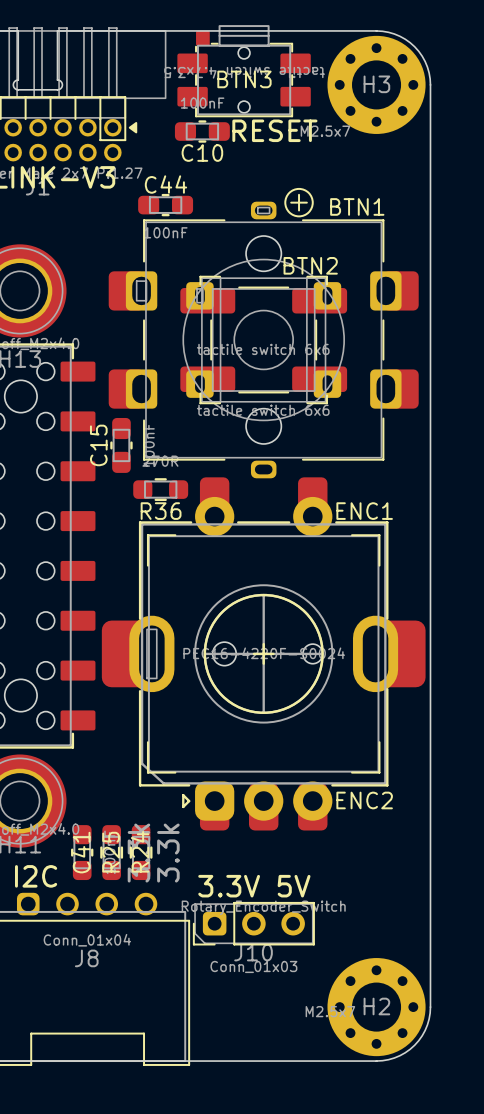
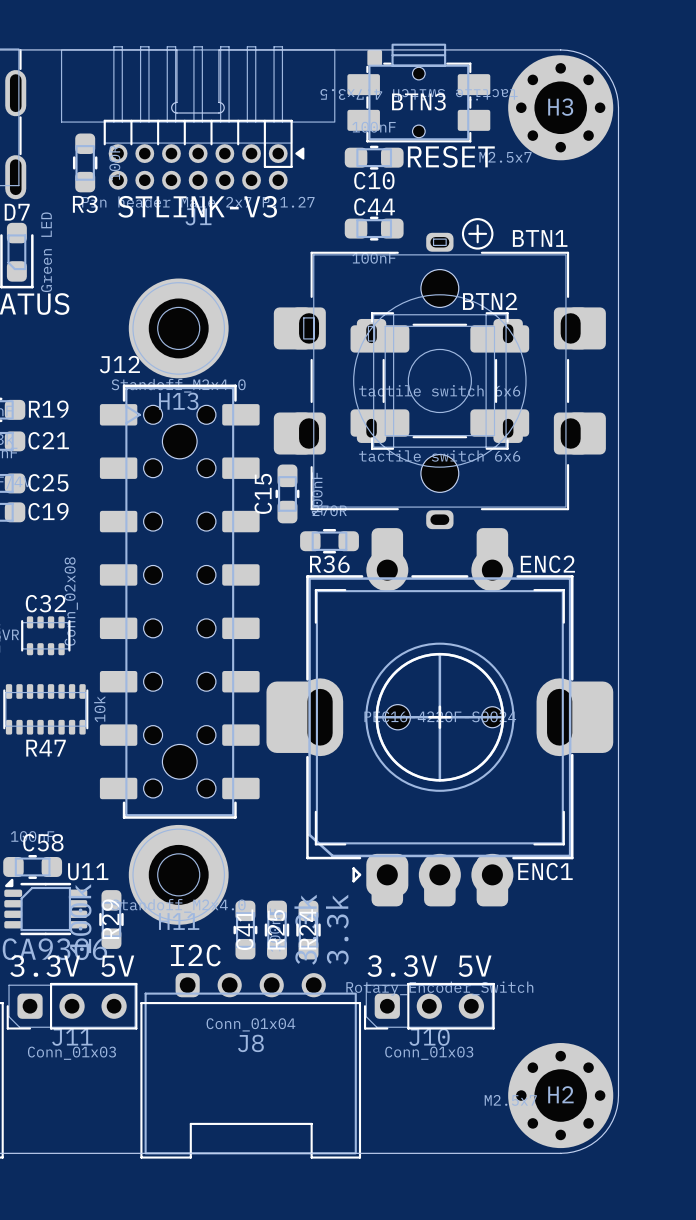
C44 position: (165, 205) -> (374, 228)
ENC1 footprint: [129, 496, 399, 821] -> [296, 549, 583, 896]
ENC1 name position: ENC1 (364, 511) -> ENC1 (545, 871)
ENC2 name position: ENC2 (364, 800) -> ENC2 (547, 564)

